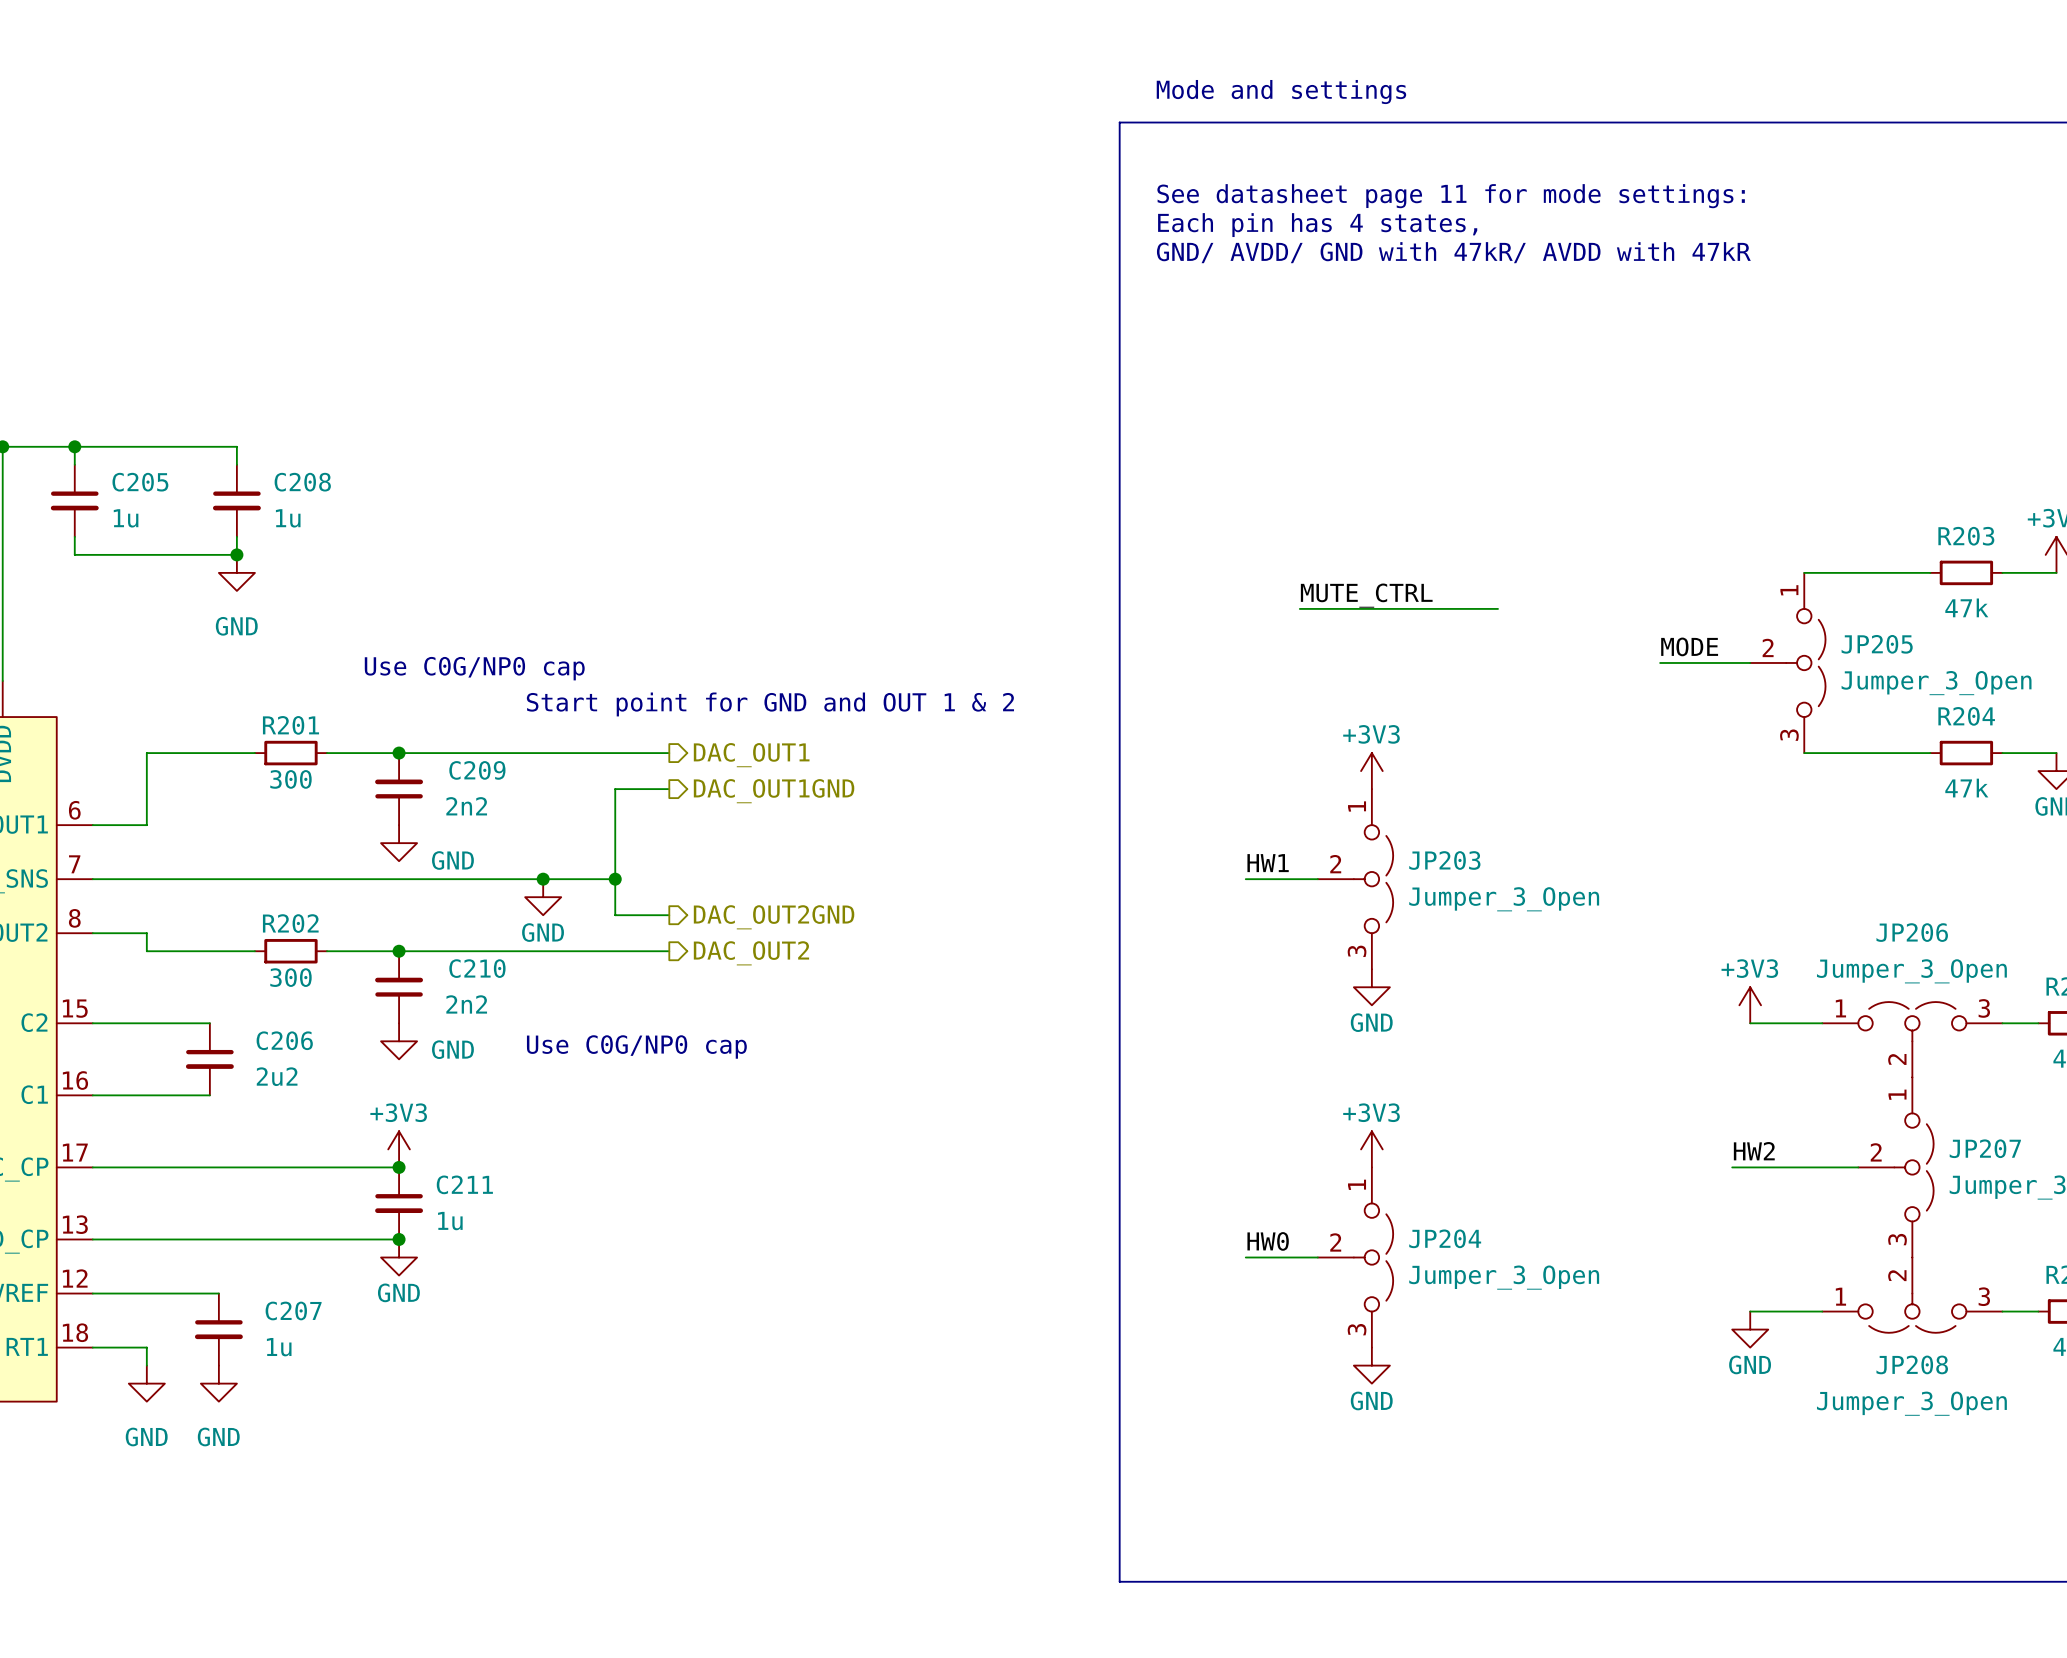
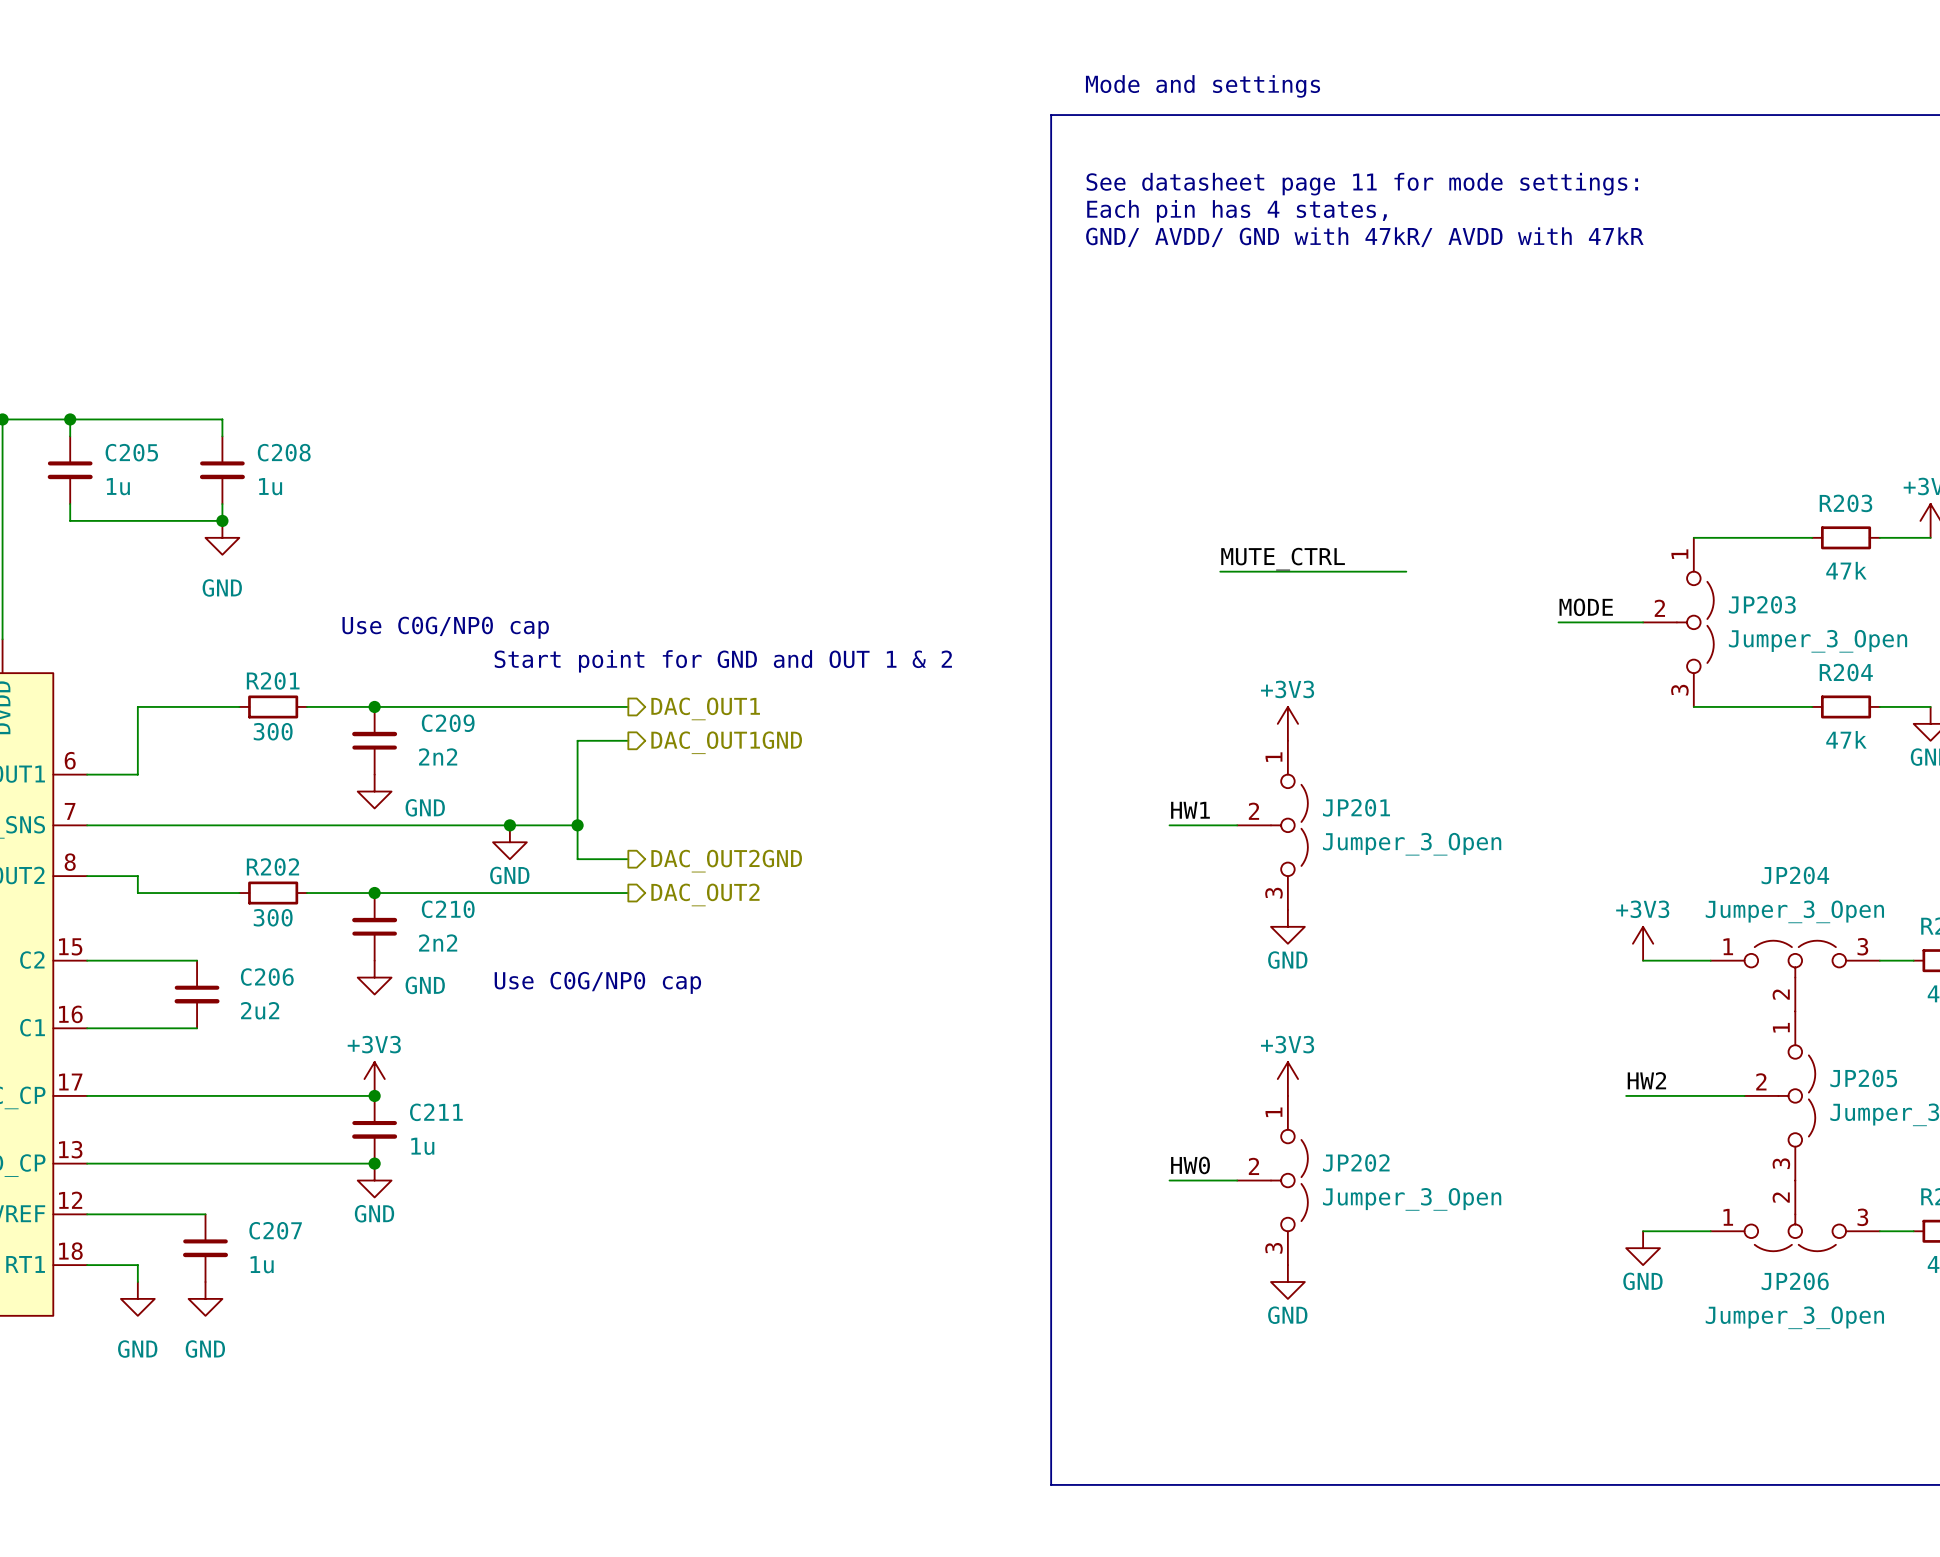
JP205 name: JP205 (1877, 644) -> JP203 (1762, 604)
JP203 name: JP203 (1444, 860) -> JP201 (1356, 807)
JP206 name: JP206 (1912, 932) -> JP204 (1795, 875)
JP207 name: JP207 (1985, 1148) -> JP205 (1863, 1078)
JP204 name: JP204 (1445, 1238) -> JP202 (1356, 1162)
JP208 name: JP208 (1912, 1364) -> JP206 (1795, 1281)

